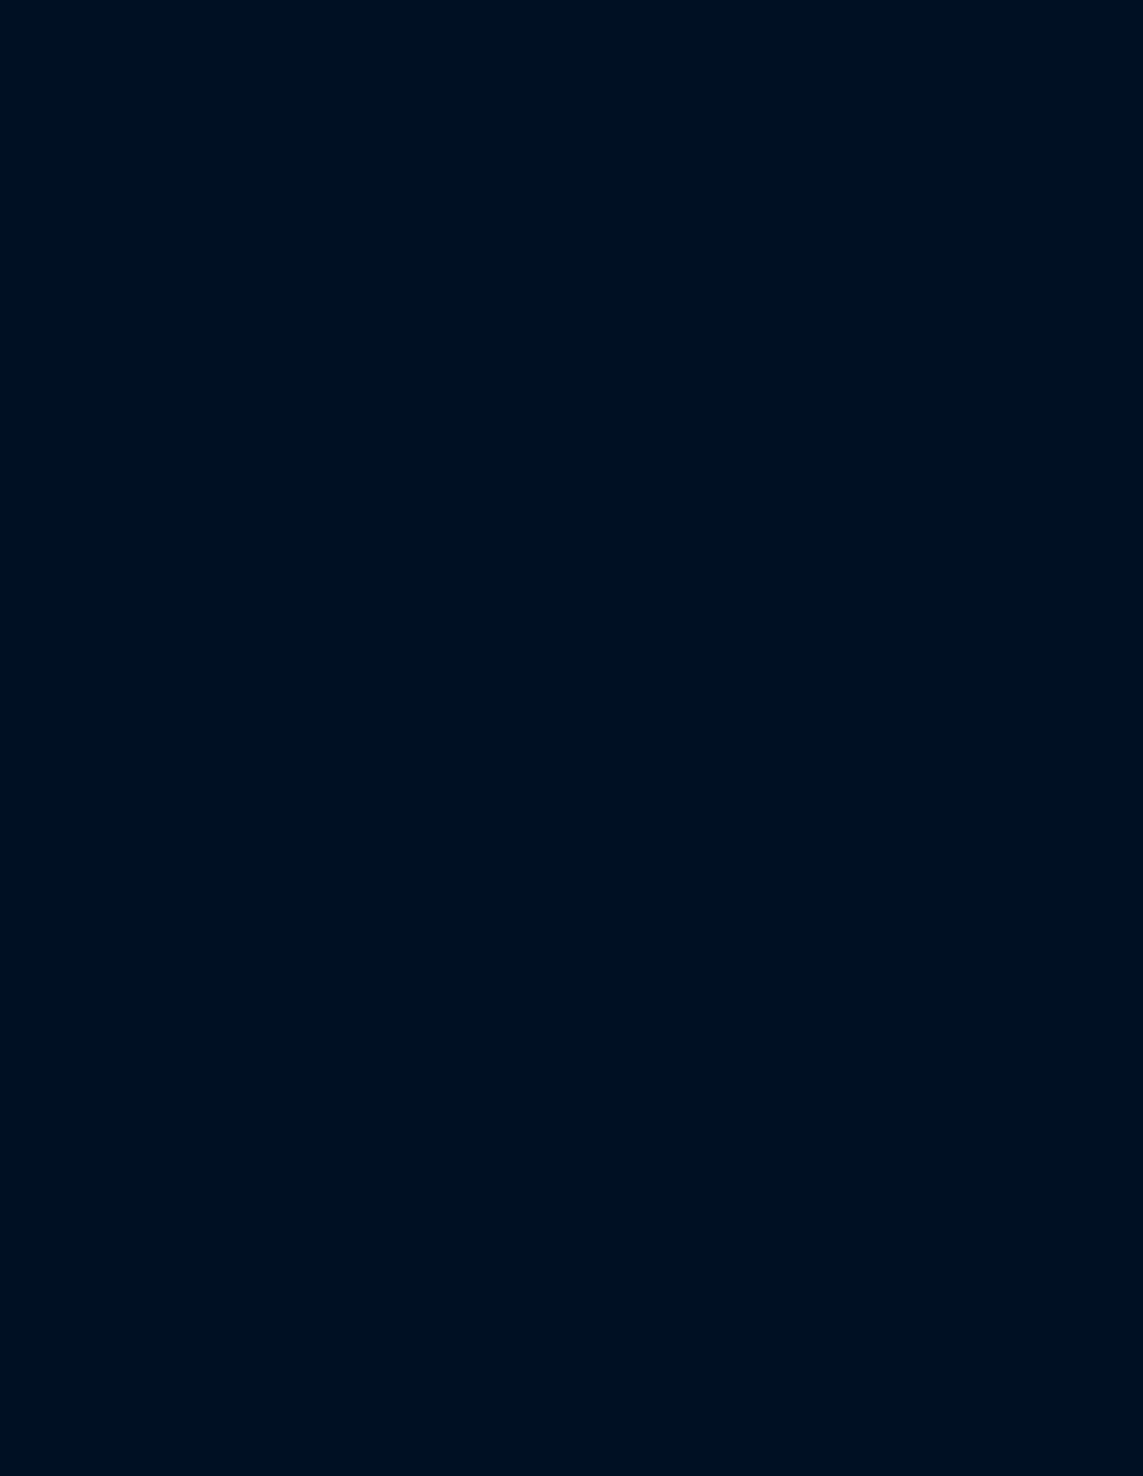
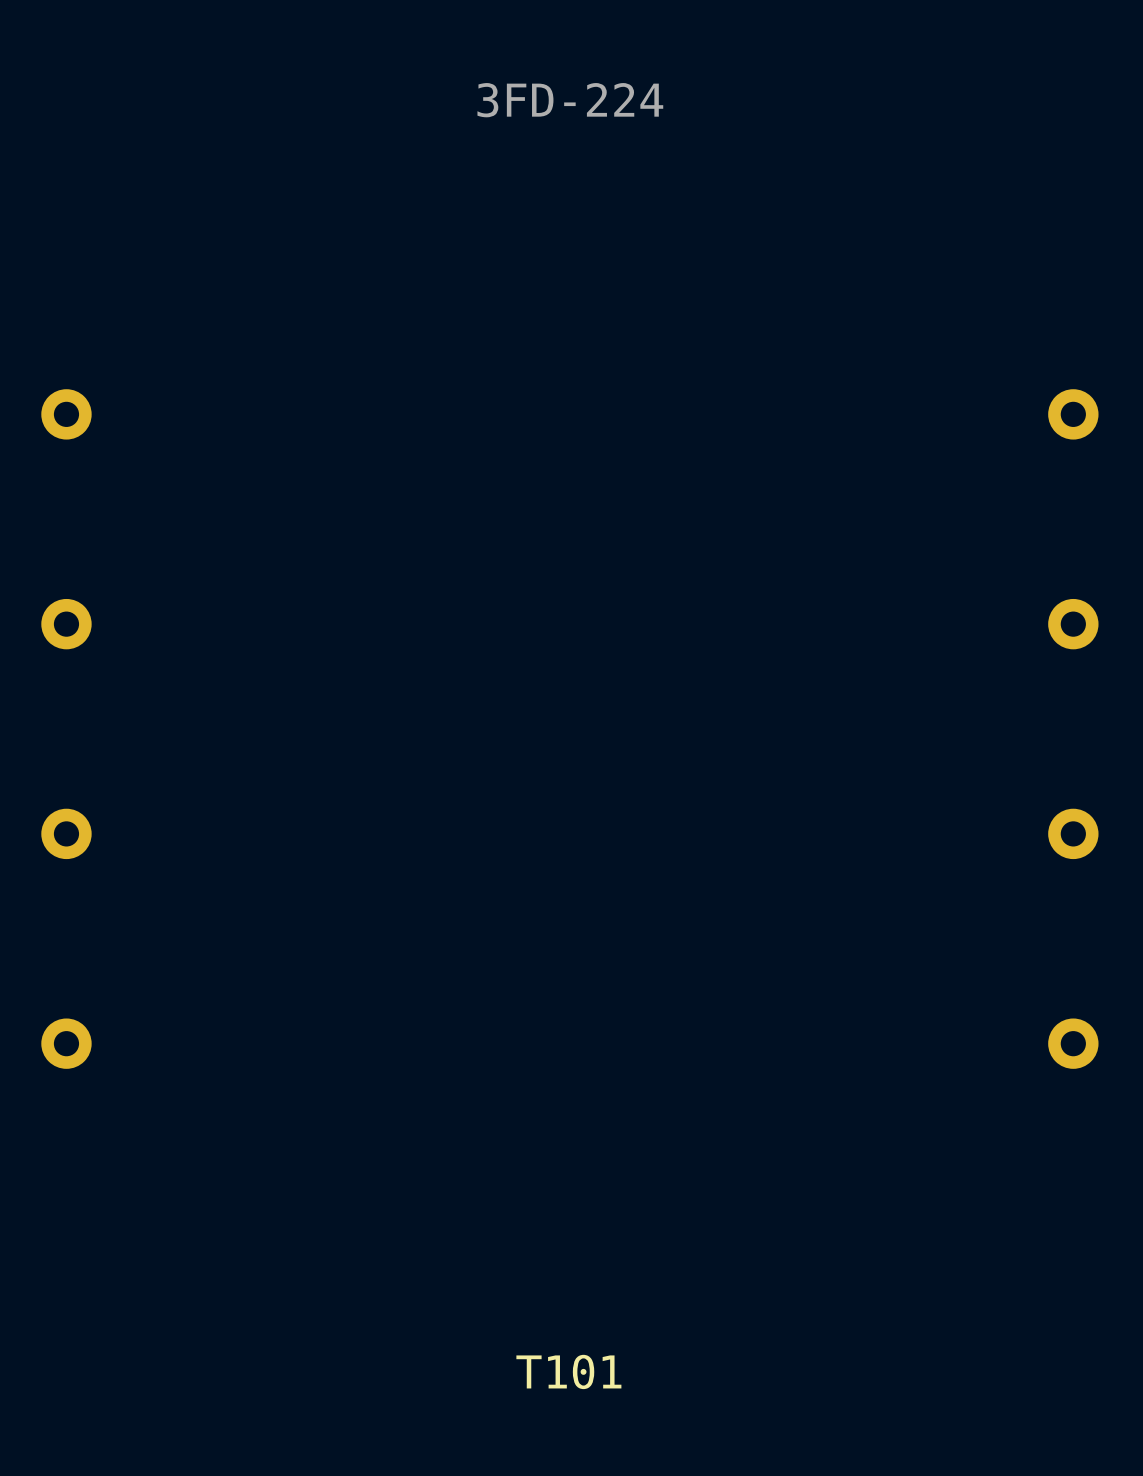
T101: none -> 3FD-224 (569, 729)

